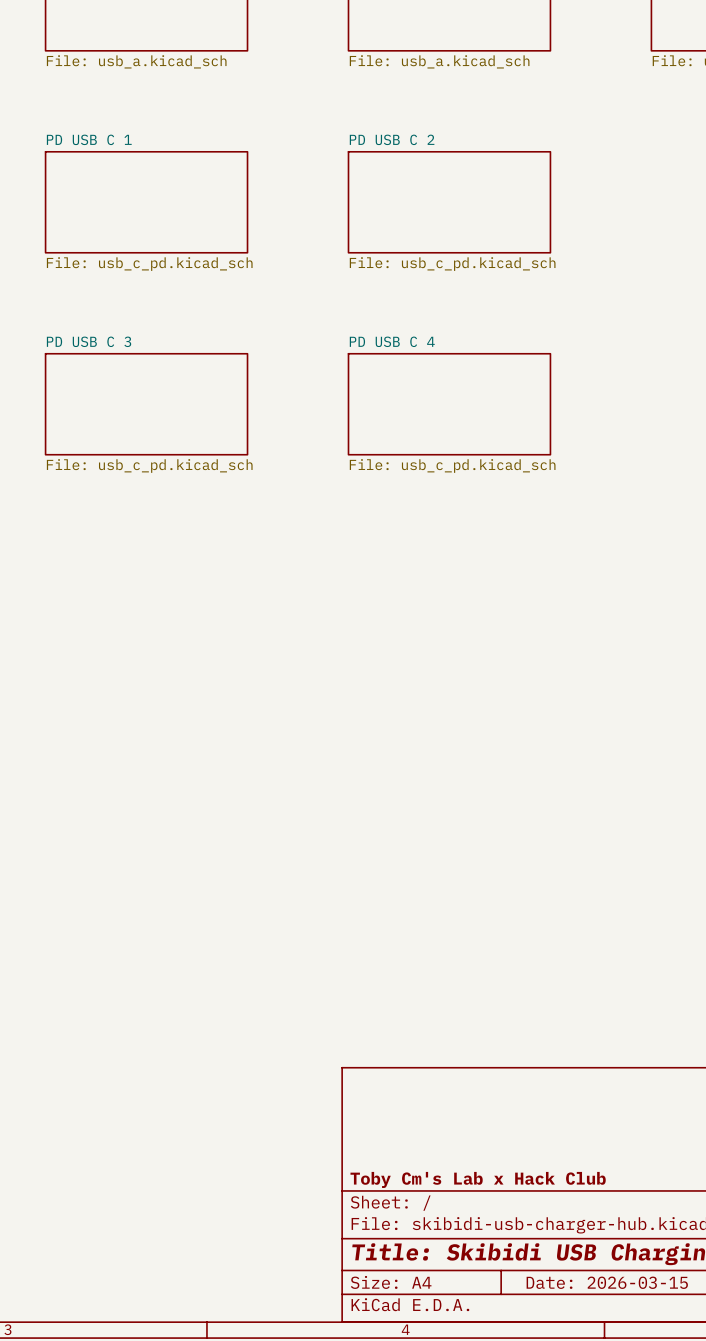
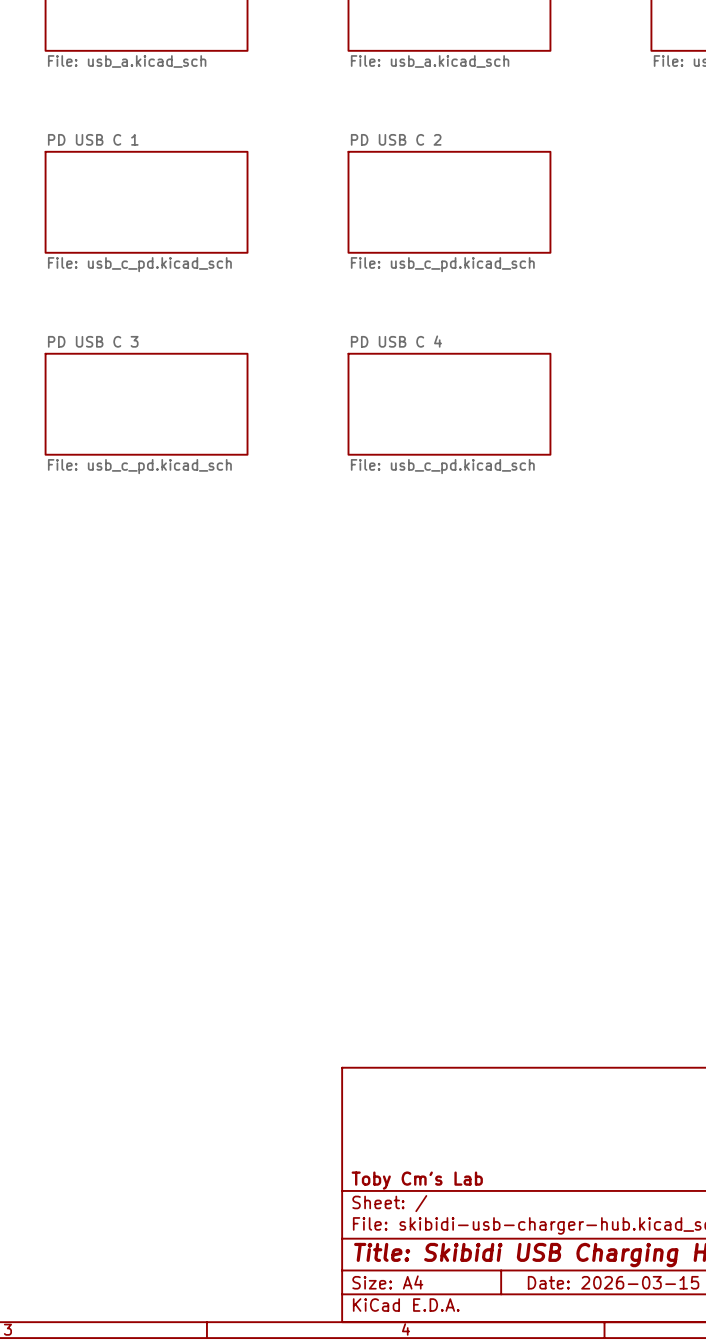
title block: Toby Cm's Lab x Hack Club (478, 1179) -> Toby Cm's Lab (417, 1180)

